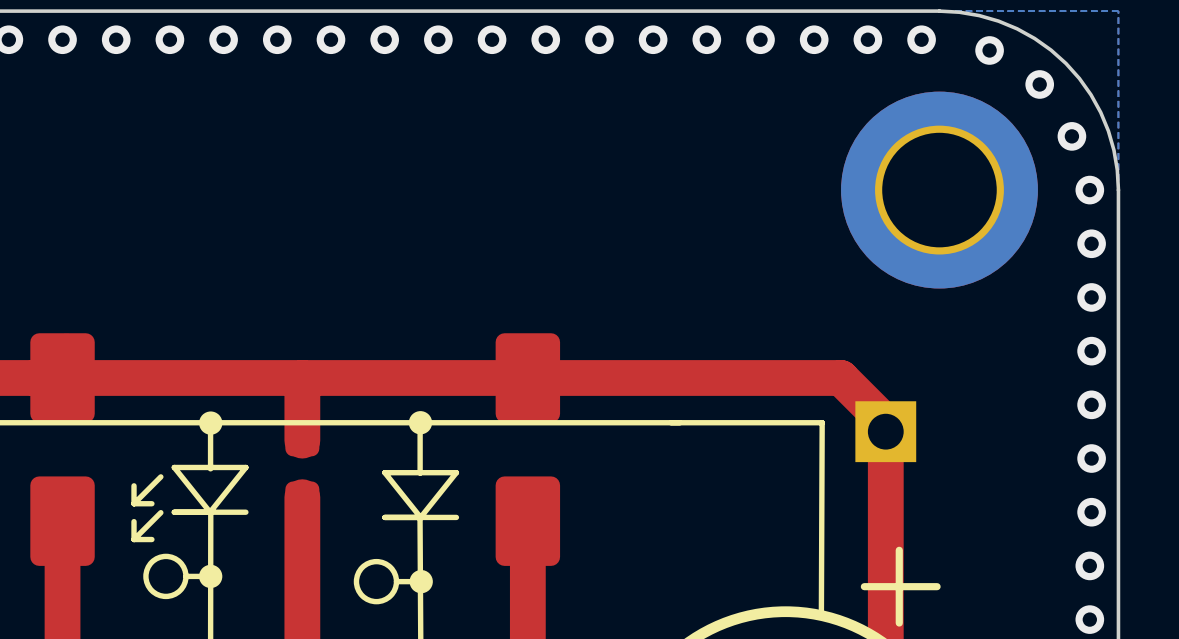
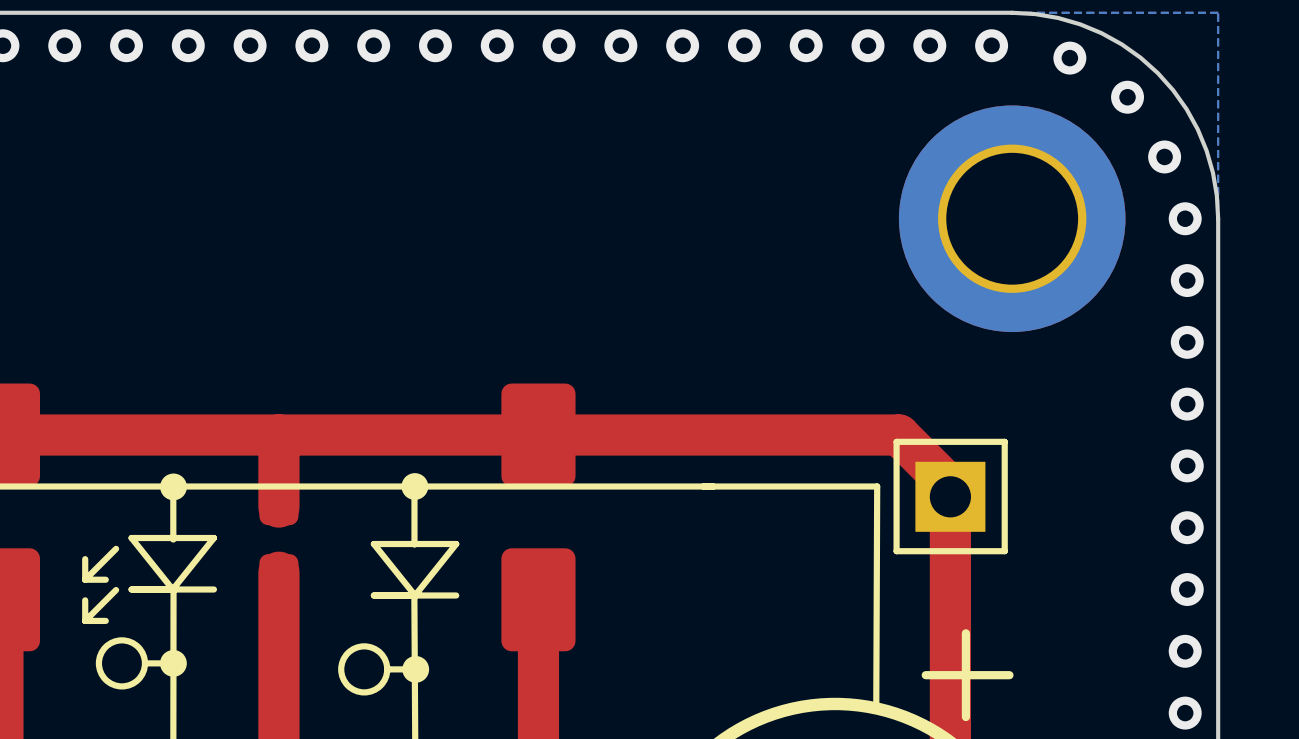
line: none -> (1004, 441) (896, 441) (896, 551) (1004, 551) (1004, 441)

